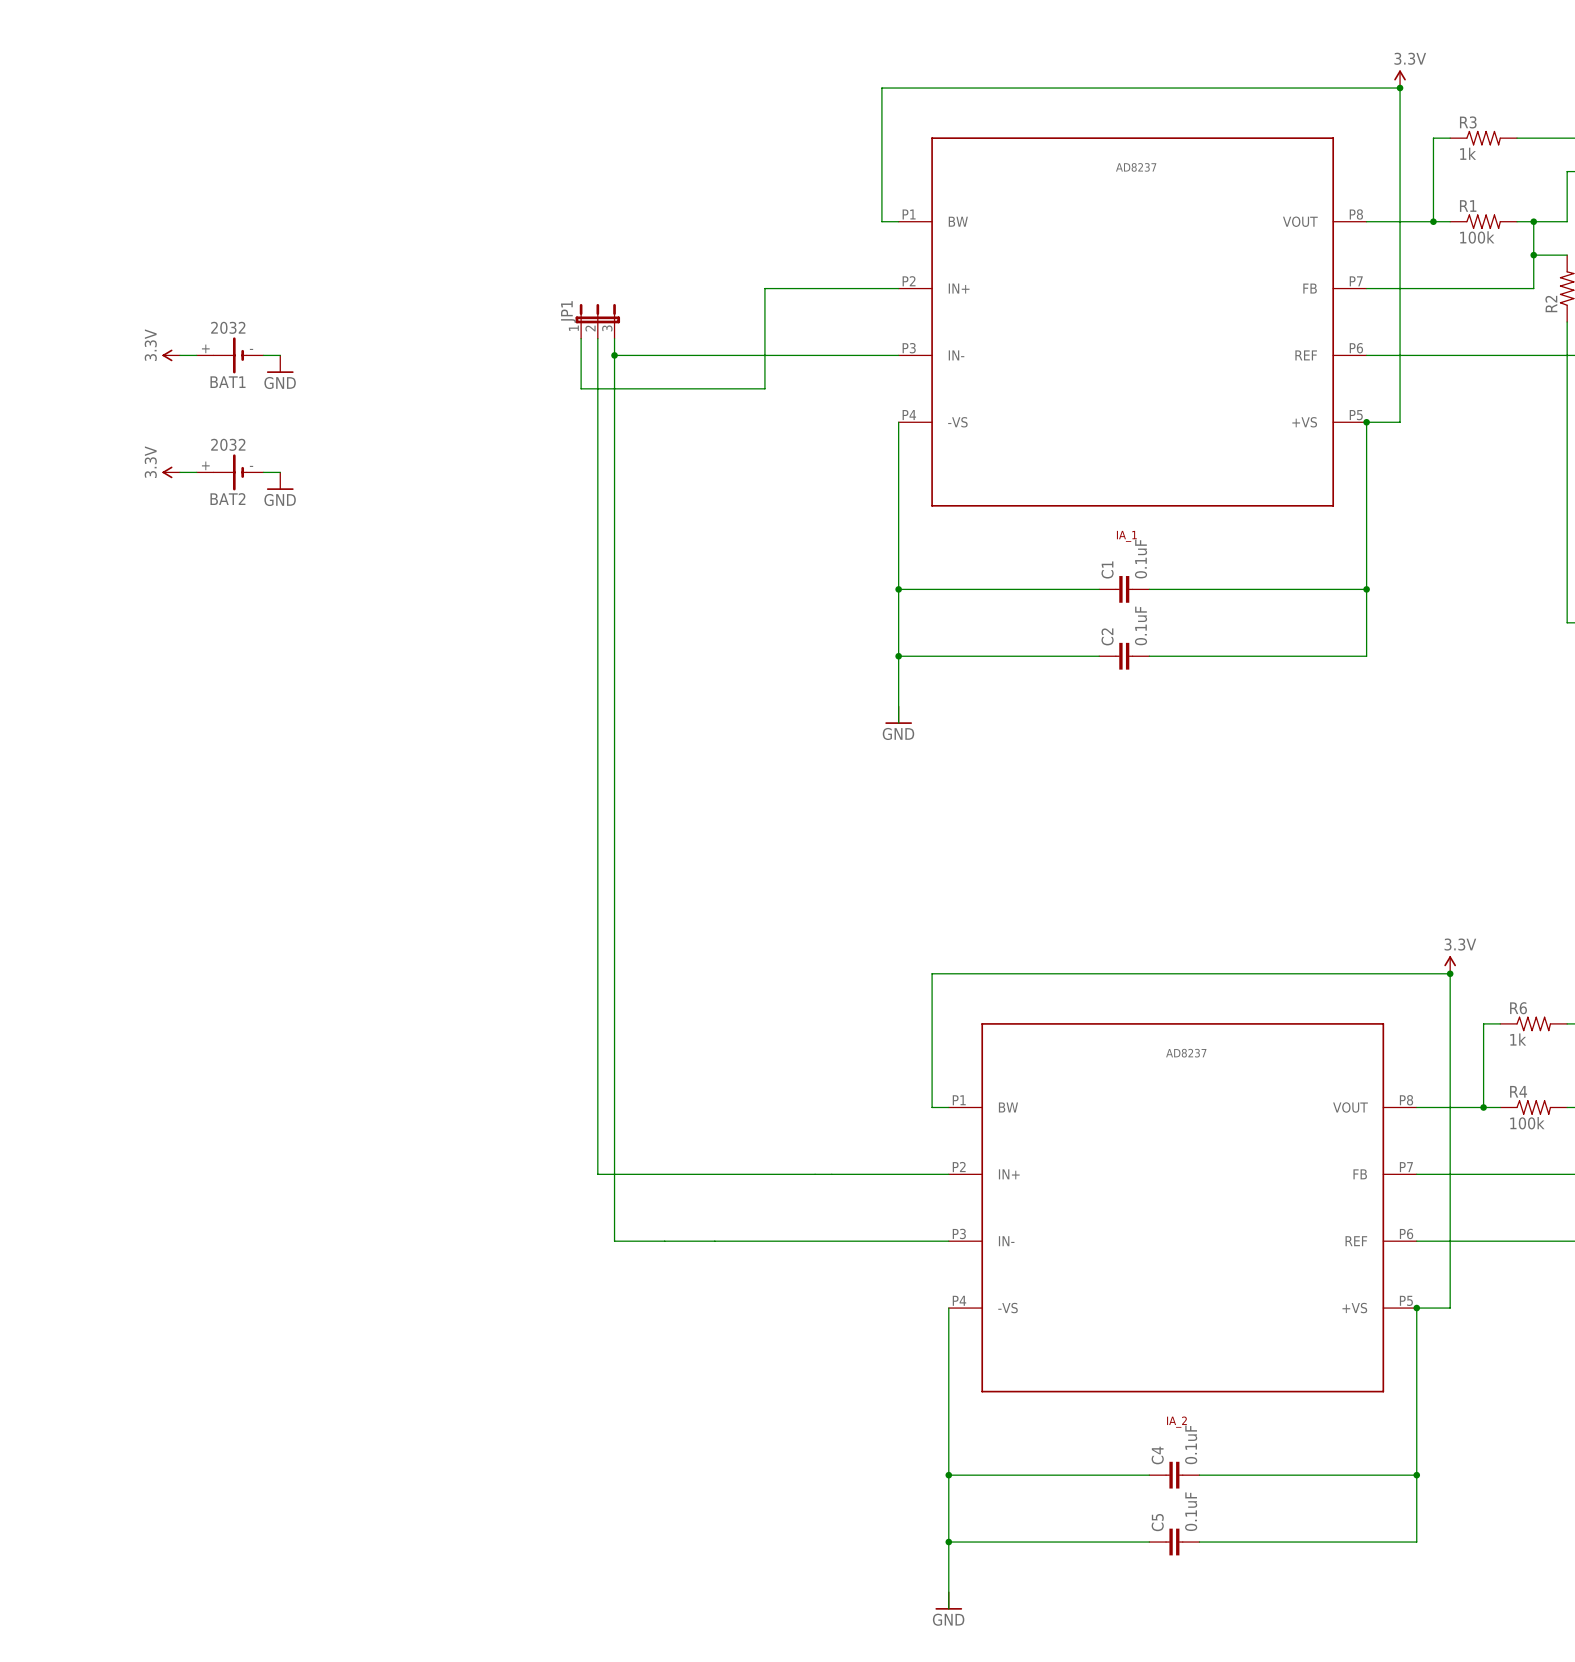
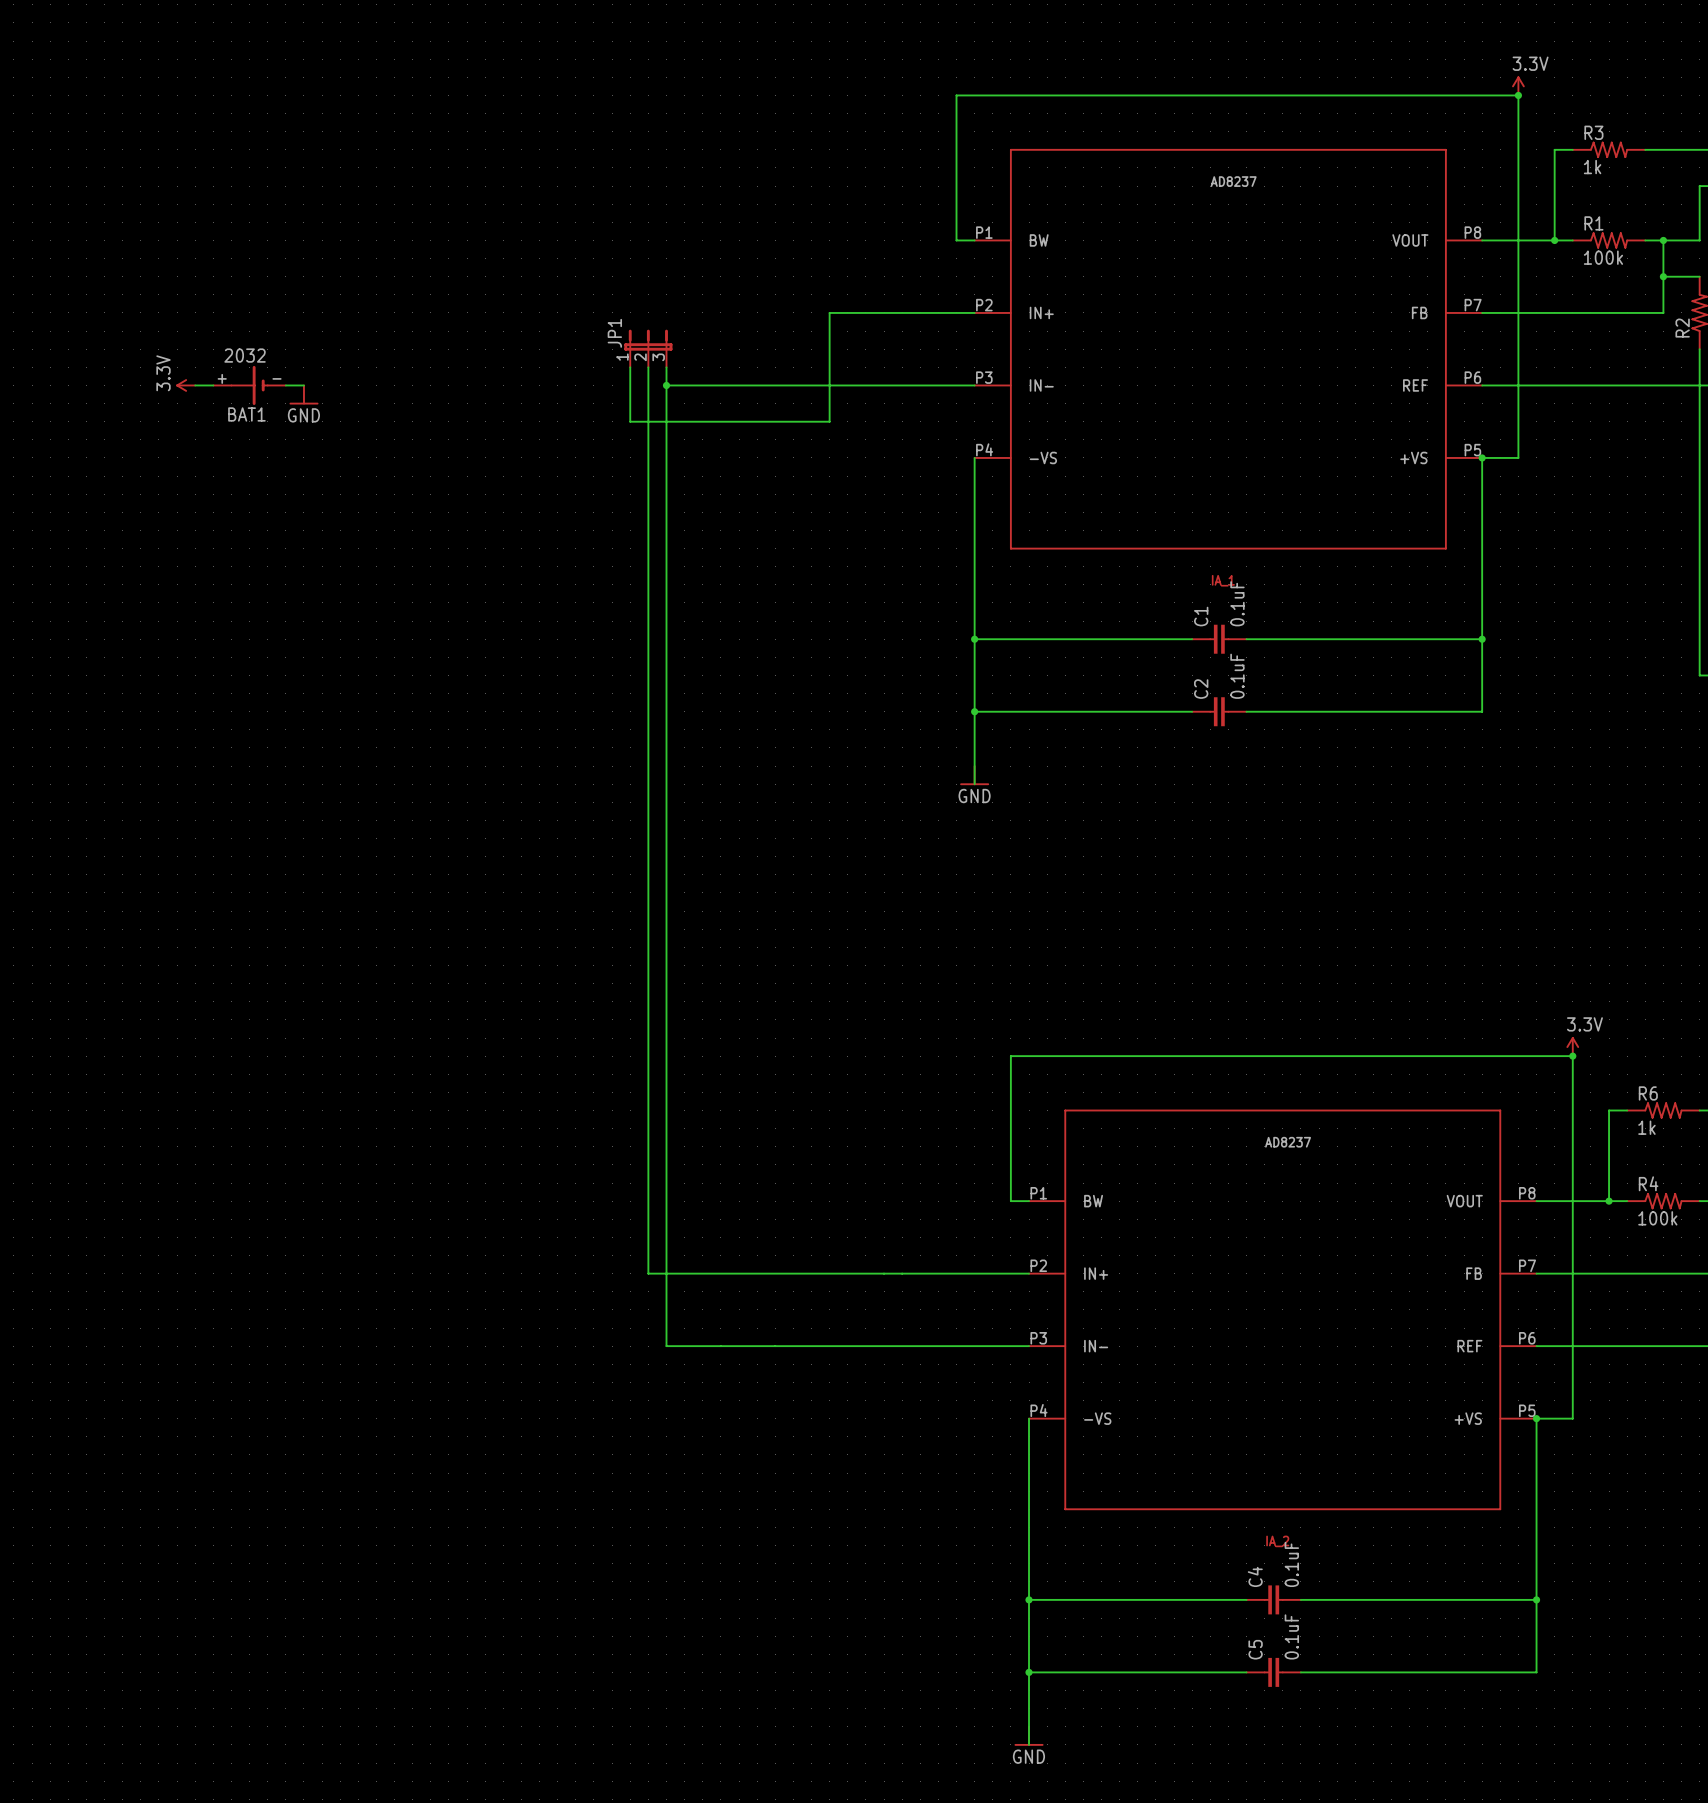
power symbol: 3.3V (171, 472) -> none
wire: (180, 472) (196, 472) -> none
BAT2: 2032 (230, 472) -> none
wire: (263, 472) (280, 472) -> none
power symbol: GND (280, 481) -> none

